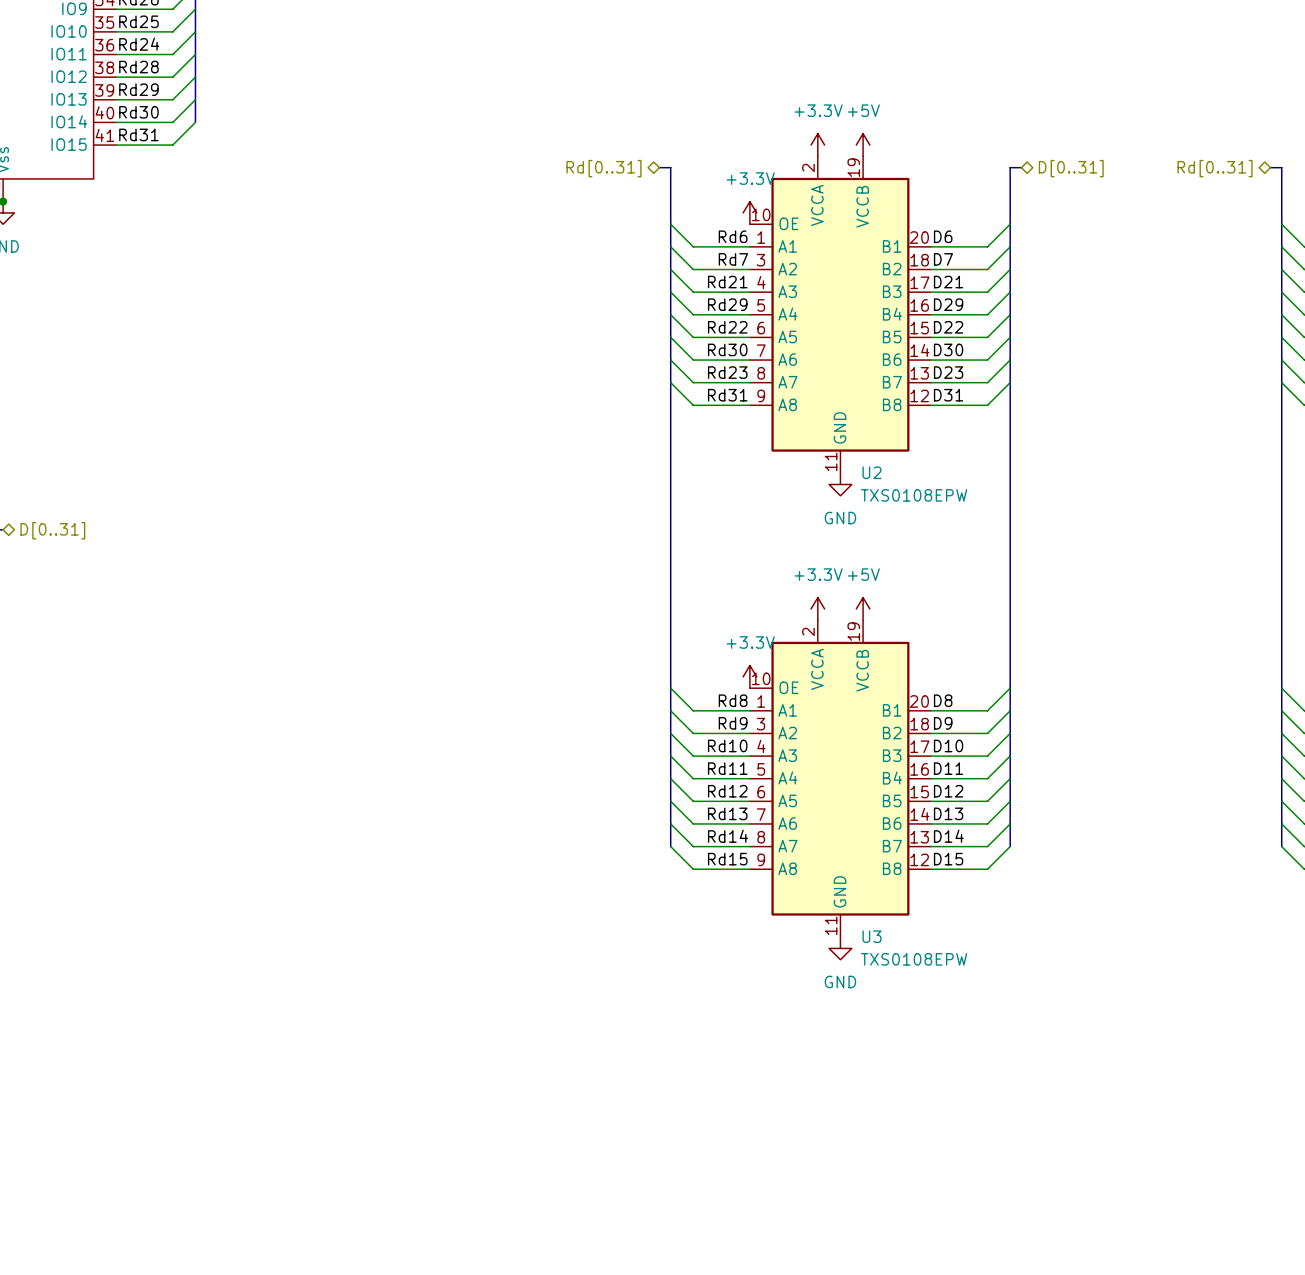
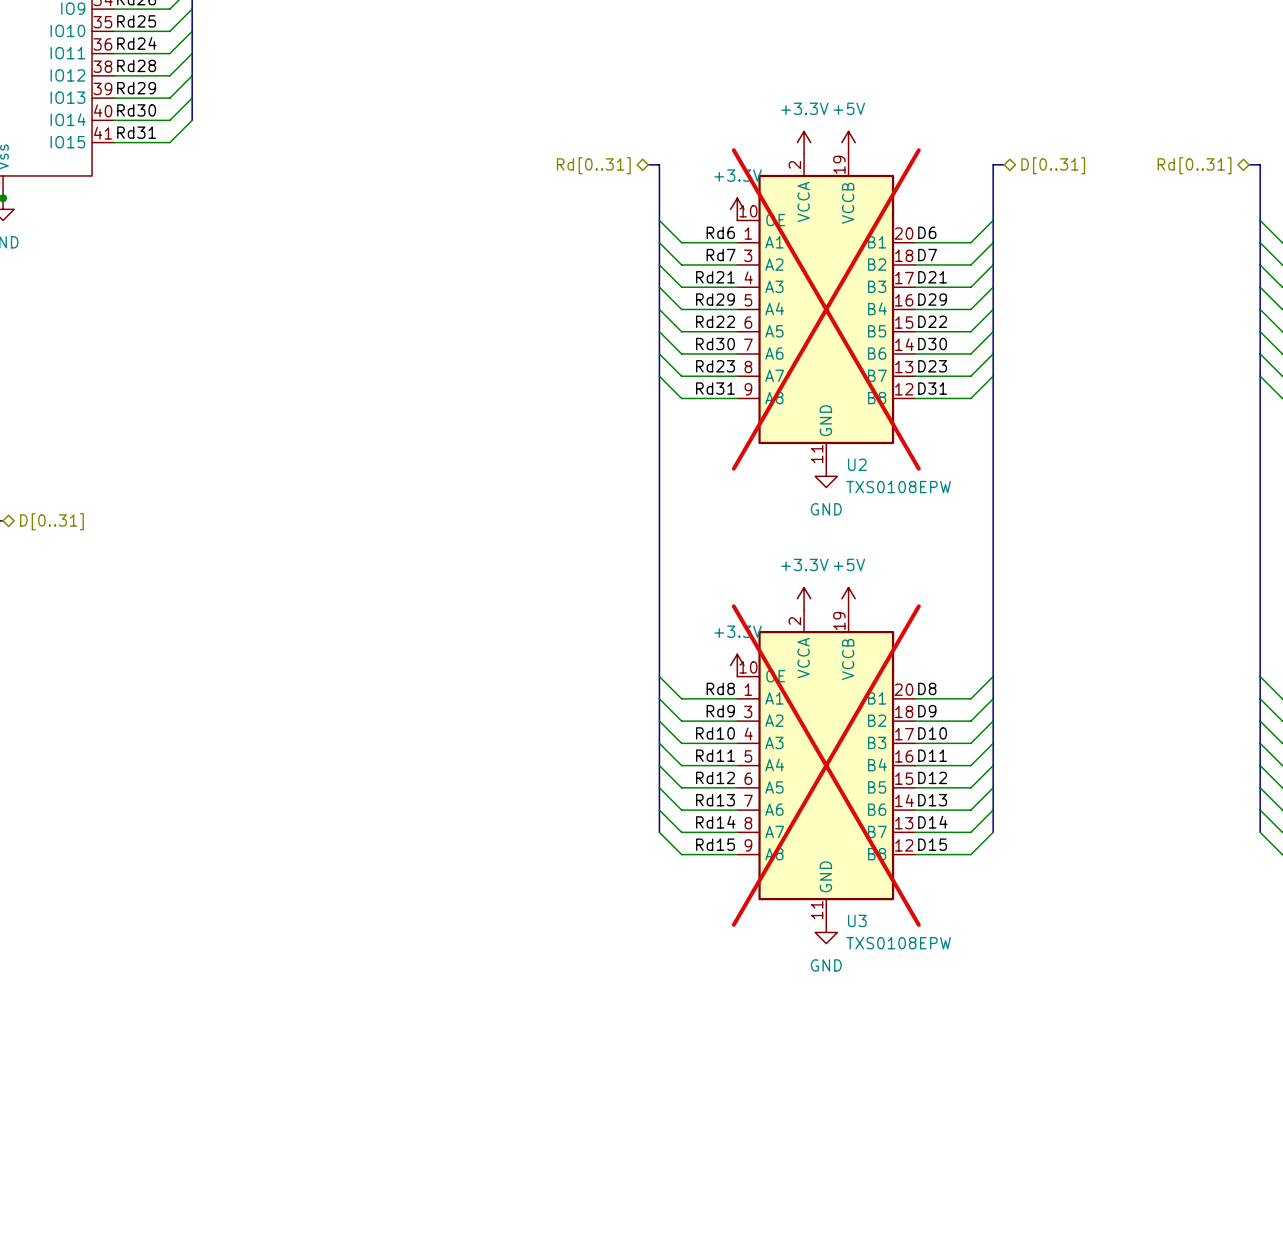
U2 do-not-place cross: none -> (826, 309)
U3 do-not-place cross: none -> (826, 765)

